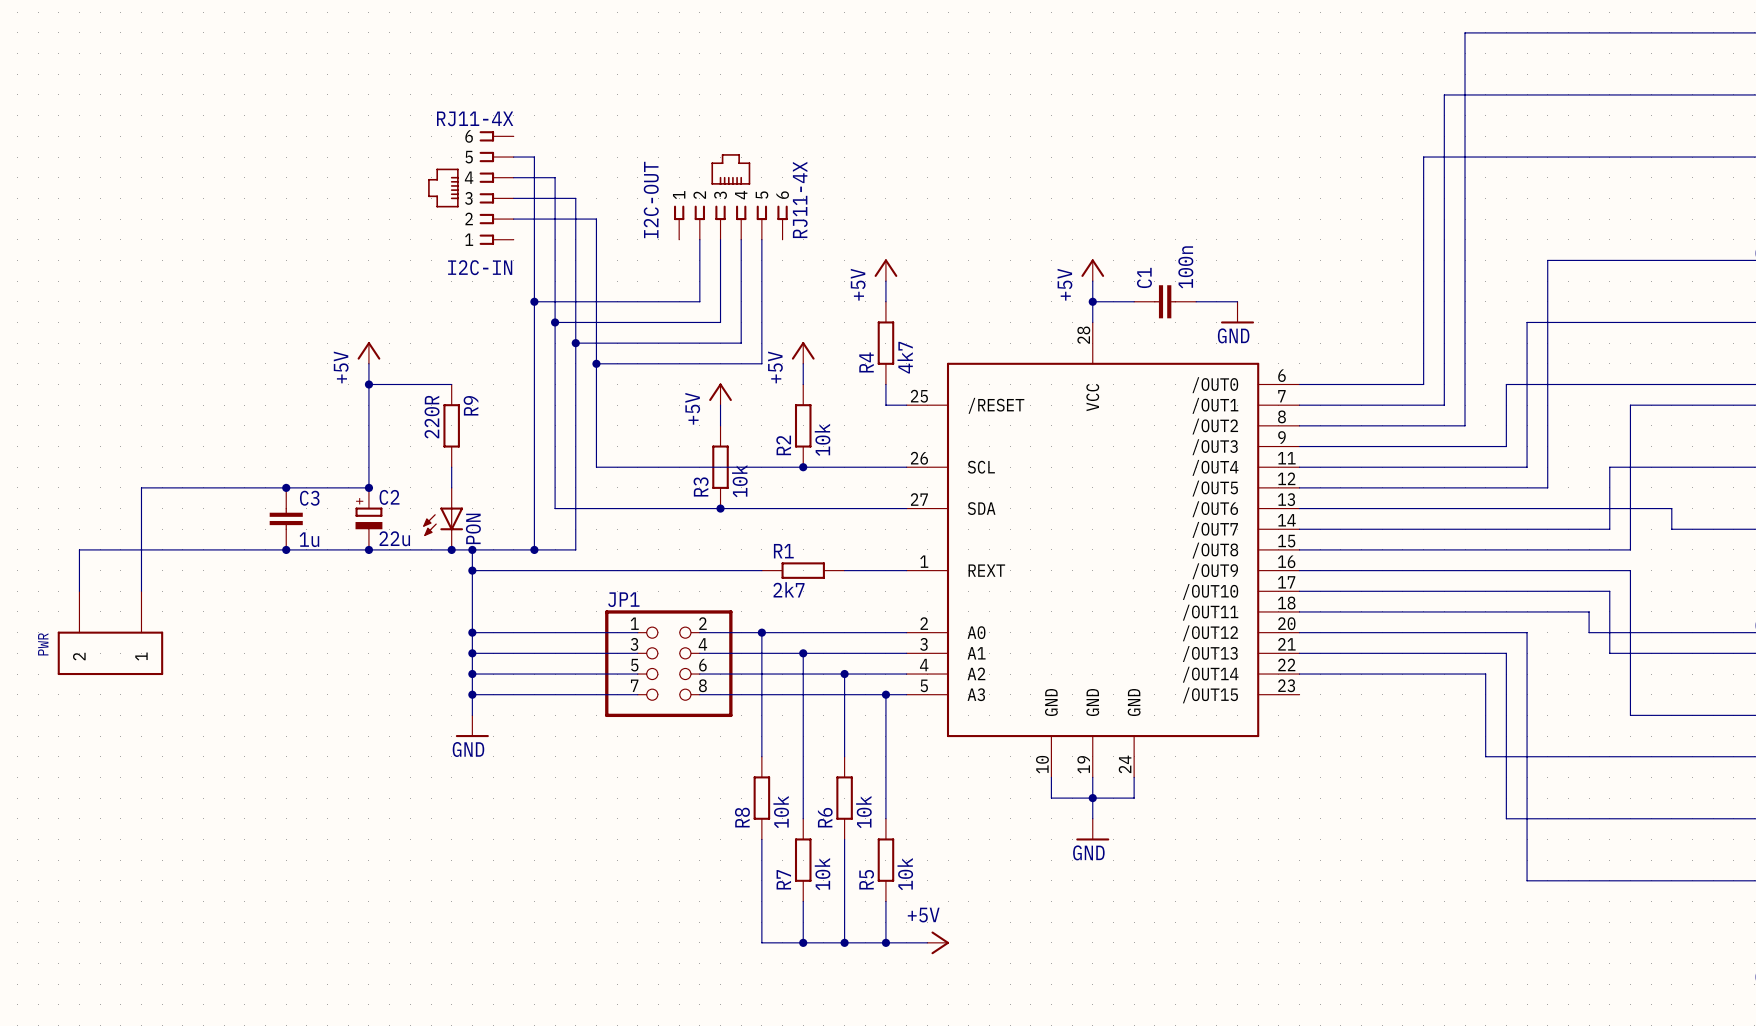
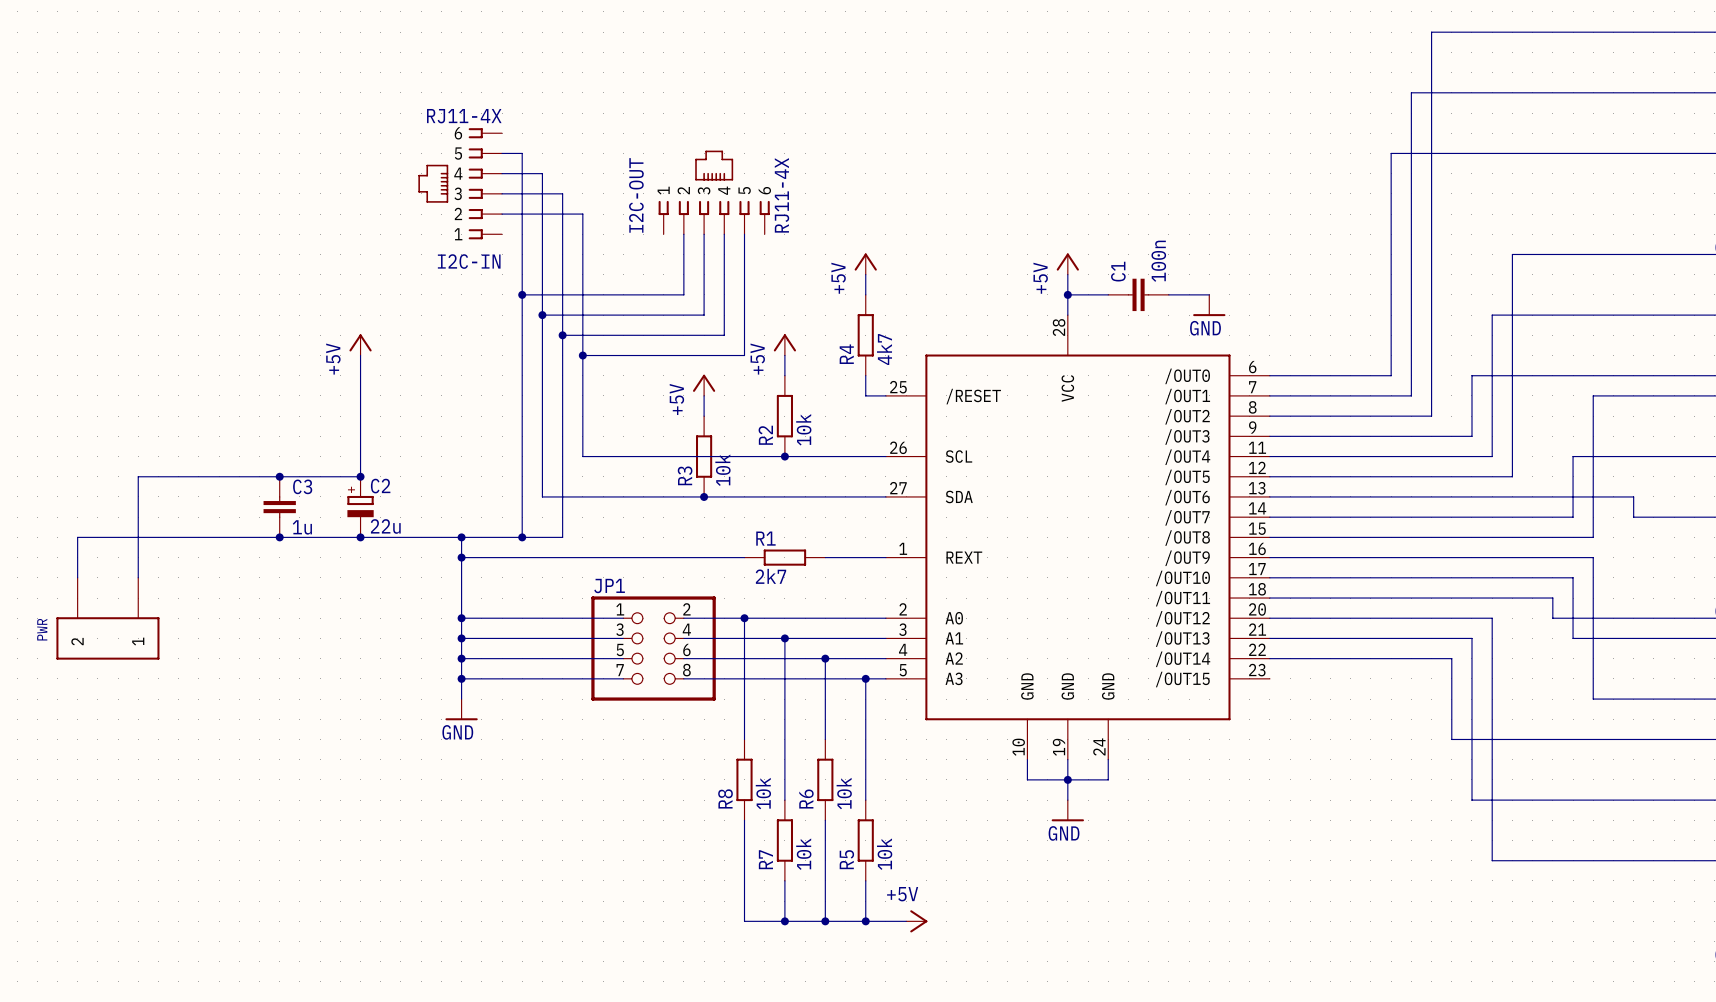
wire: (368, 384) (451, 384) -> none
junction: (368, 384) -> none
R9: 220R (451, 425) -> none
wire: (451, 467) (451, 487) -> none
PON: (443, 518) -> none
junction: (451, 549) -> none

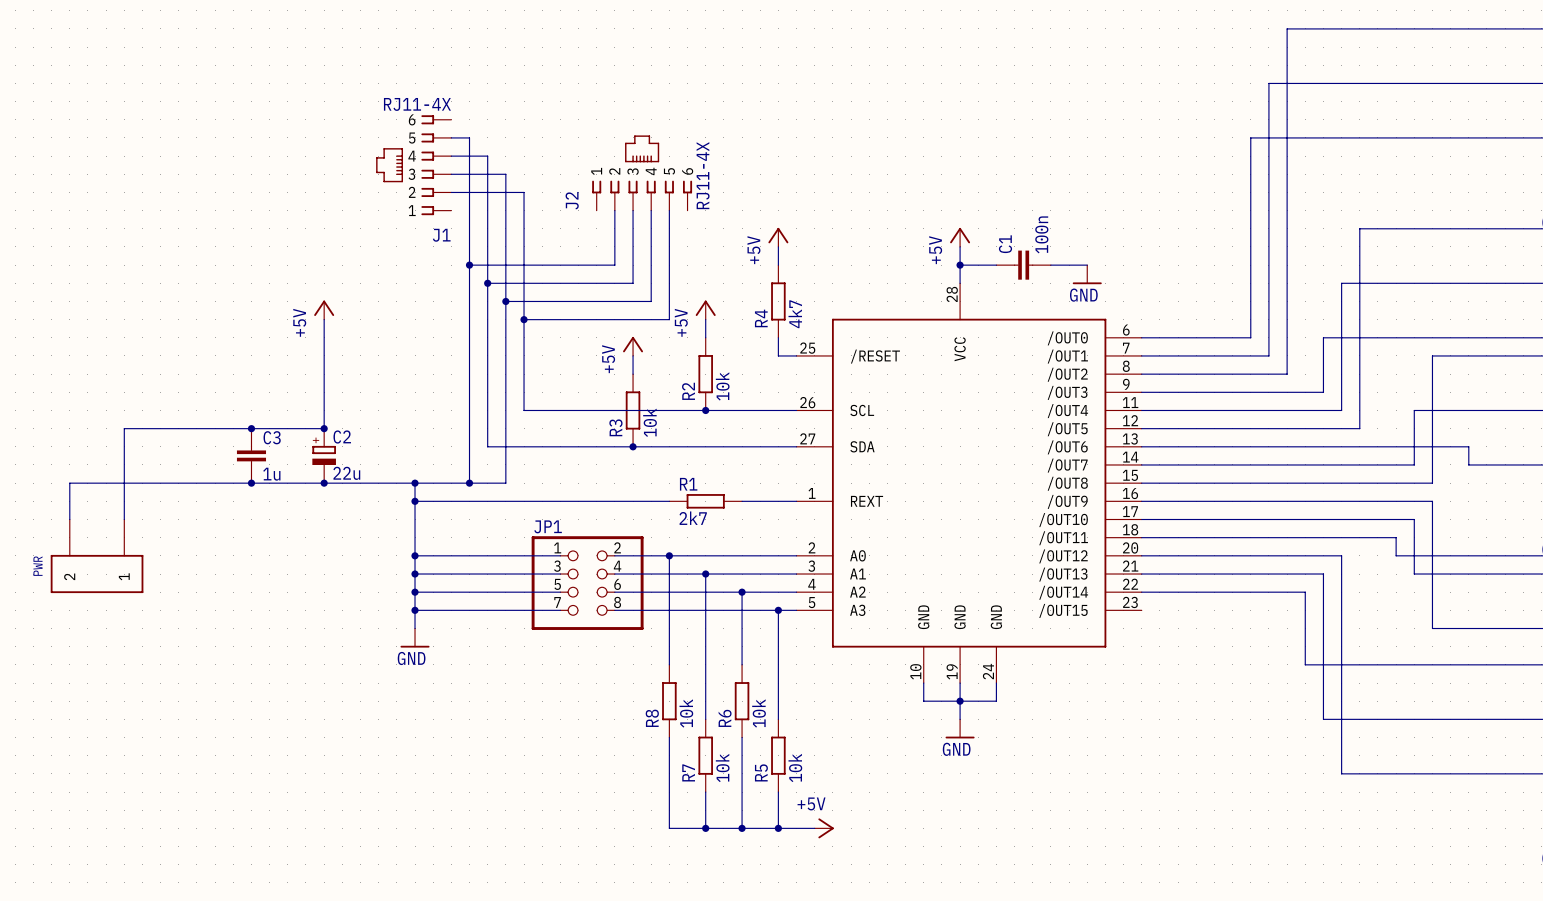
I2C-OUT name: I2C-OUT (636, 195) -> J2 (572, 200)
I2C-IN name: I2C-IN (469, 261) -> J1 (441, 235)

